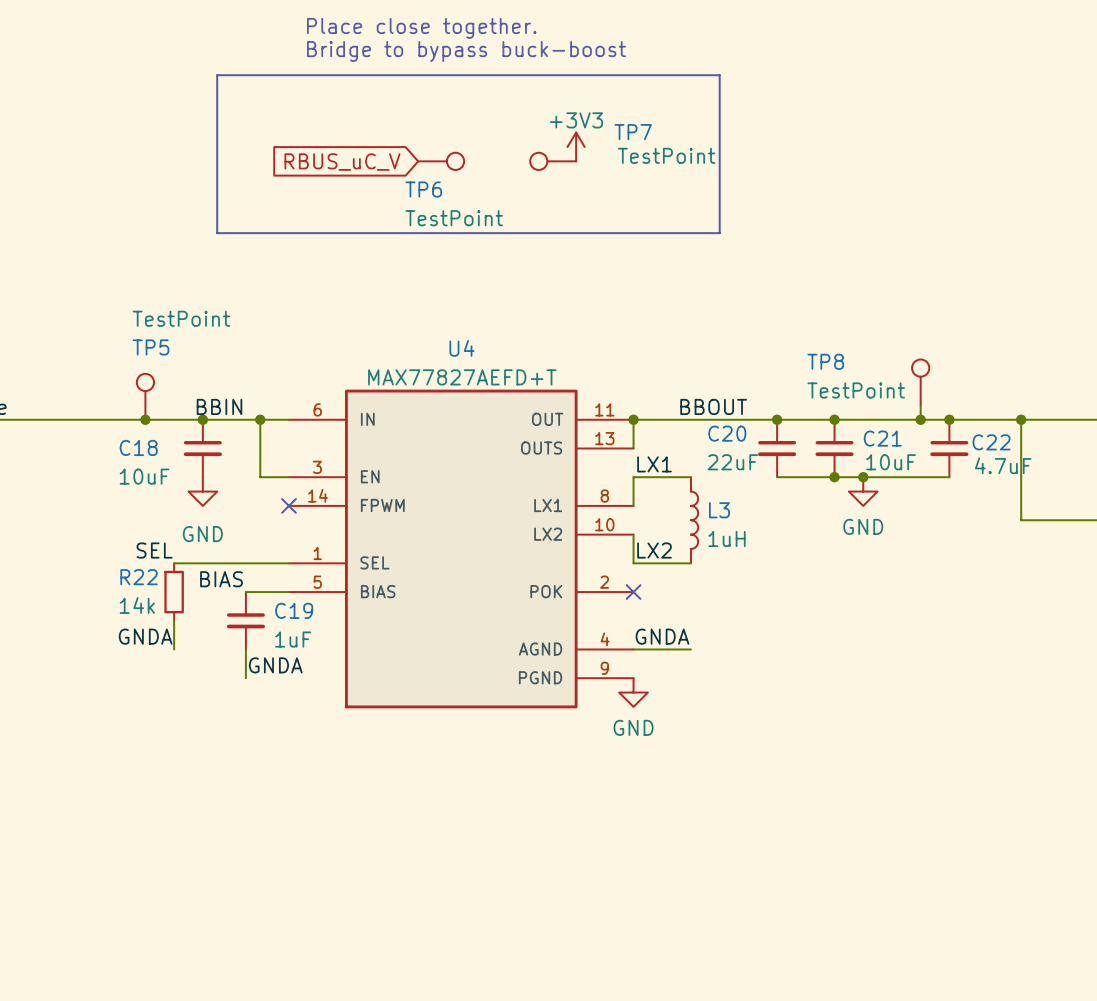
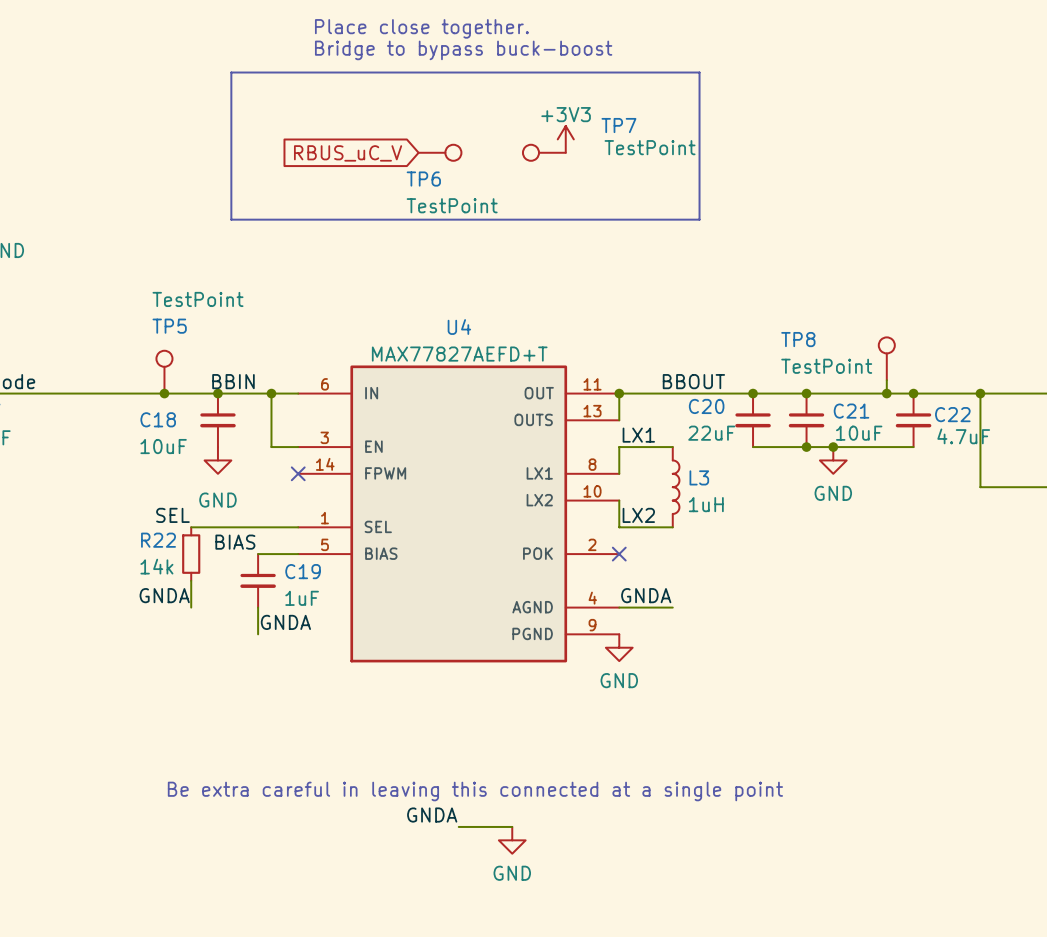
text: none -> Be extra careful in leaving this connected at a single point (475, 791)
label: none -> GNDA (432, 815)
wire: none -> (458, 826) (512, 826)
power symbol: none -> GND (512, 840)

